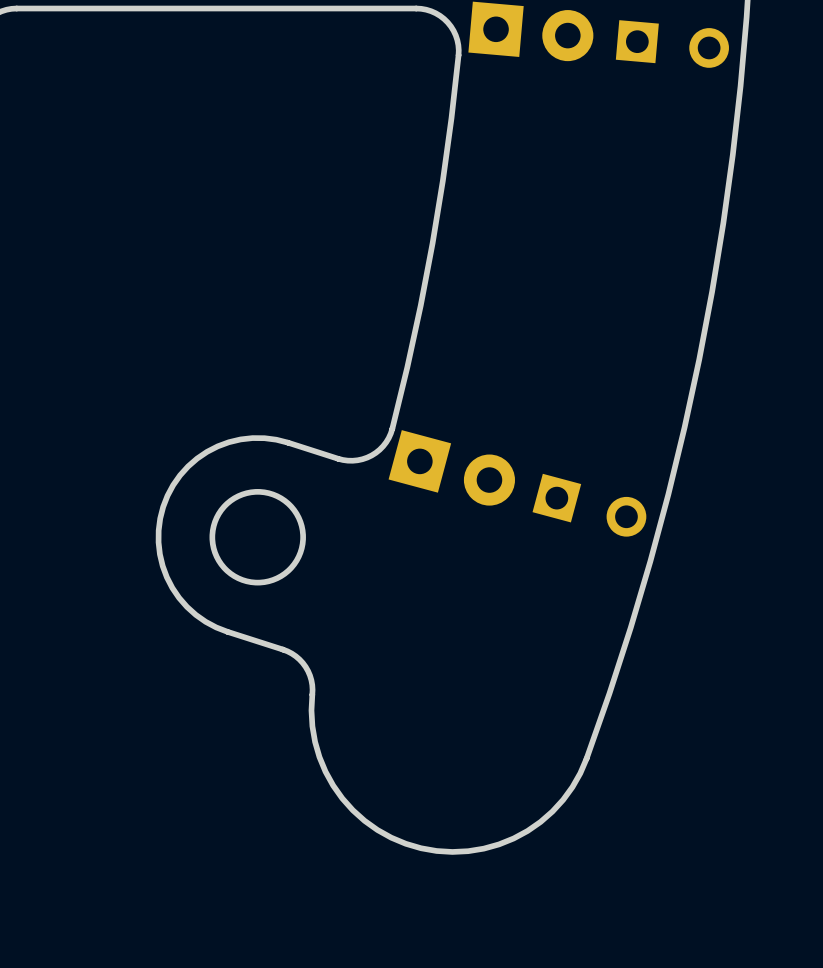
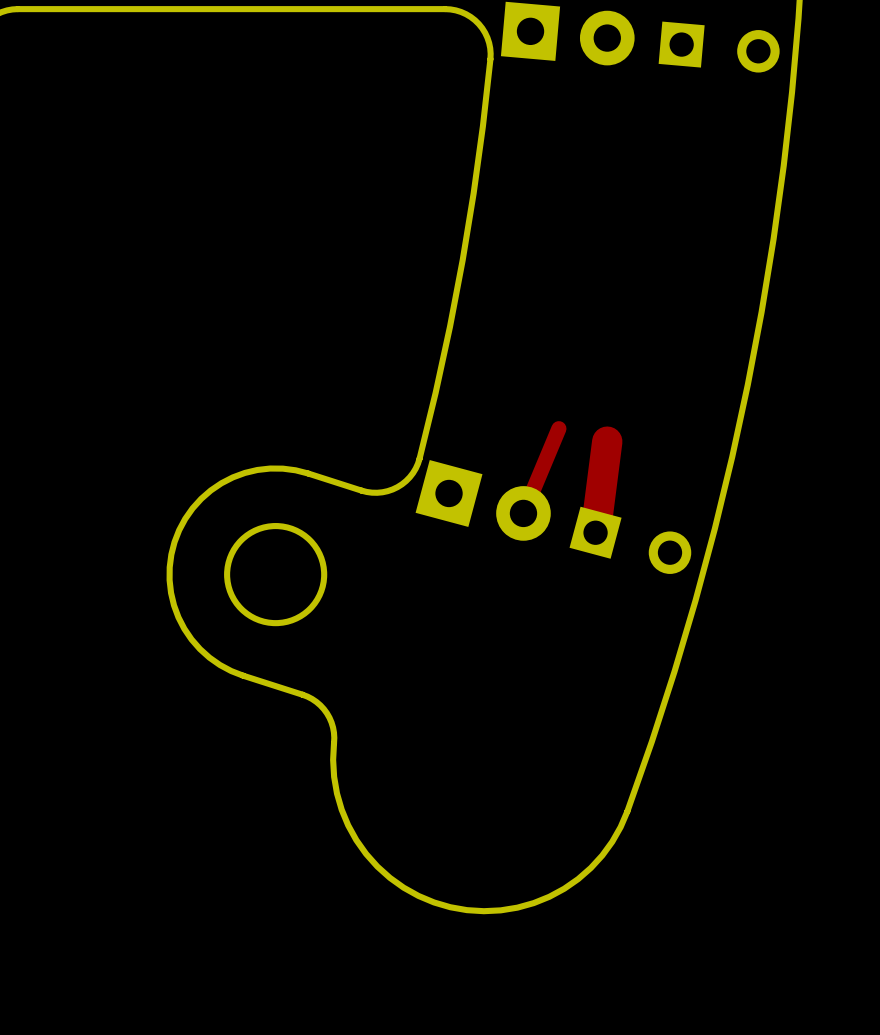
track: none -> (558, 428) (523, 513)
track: none -> (607, 441) (595, 532)

